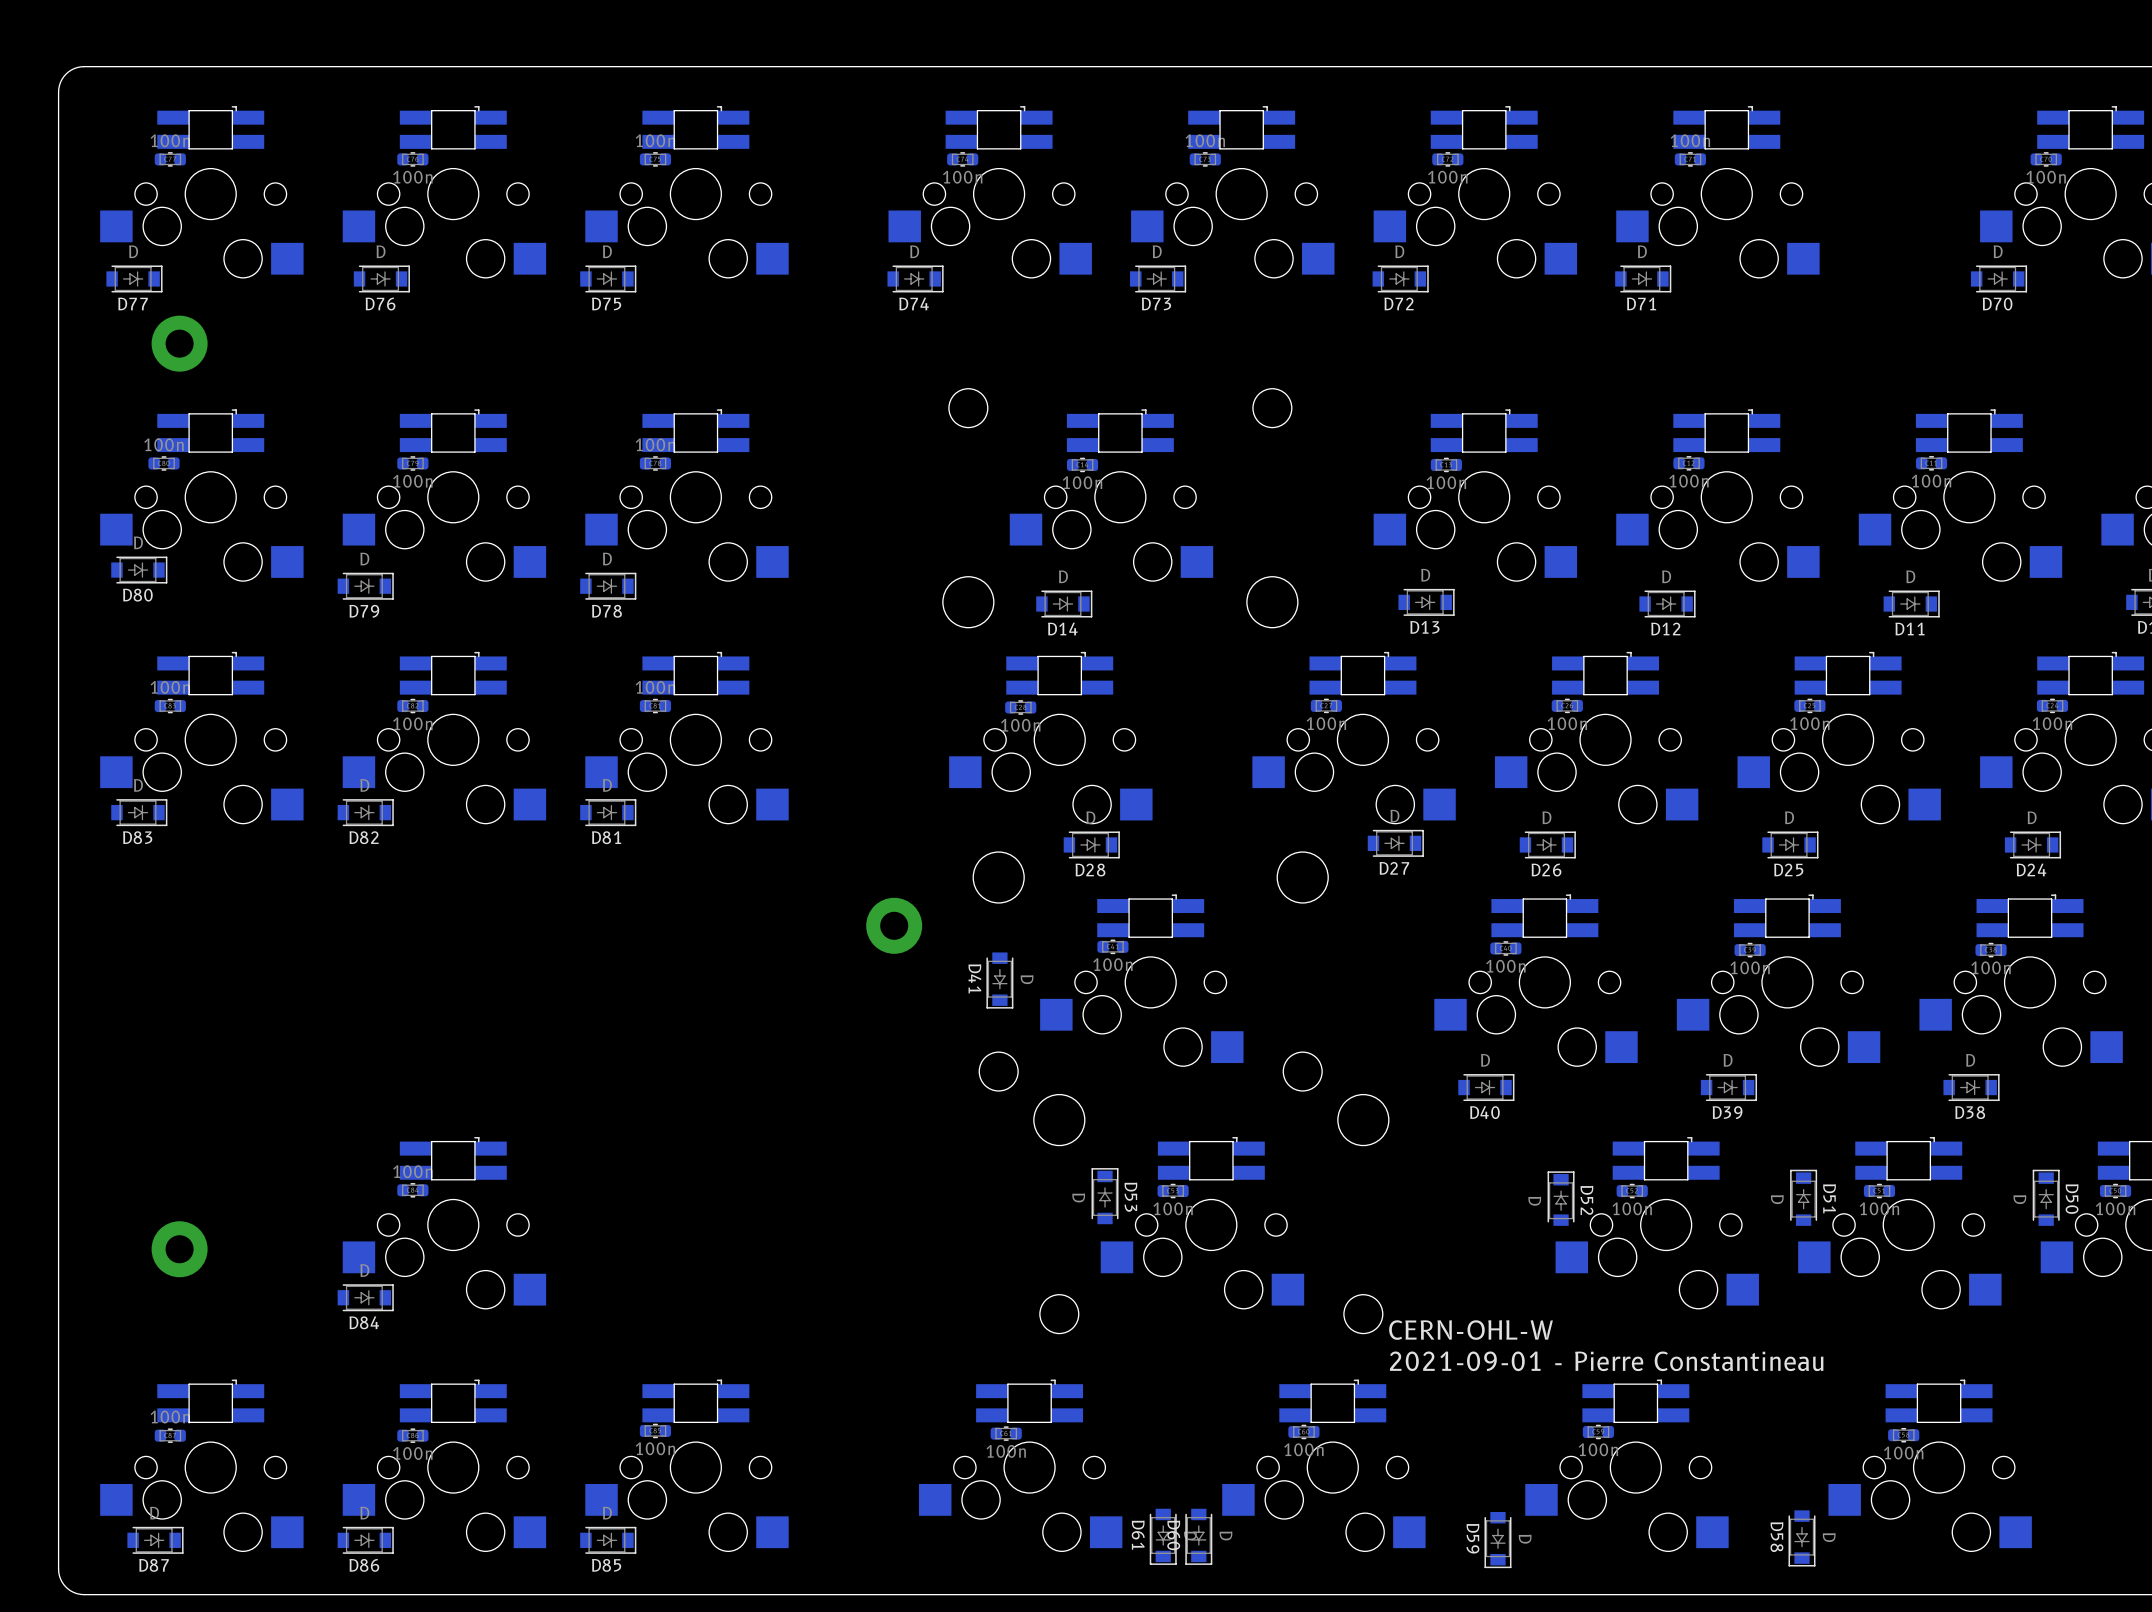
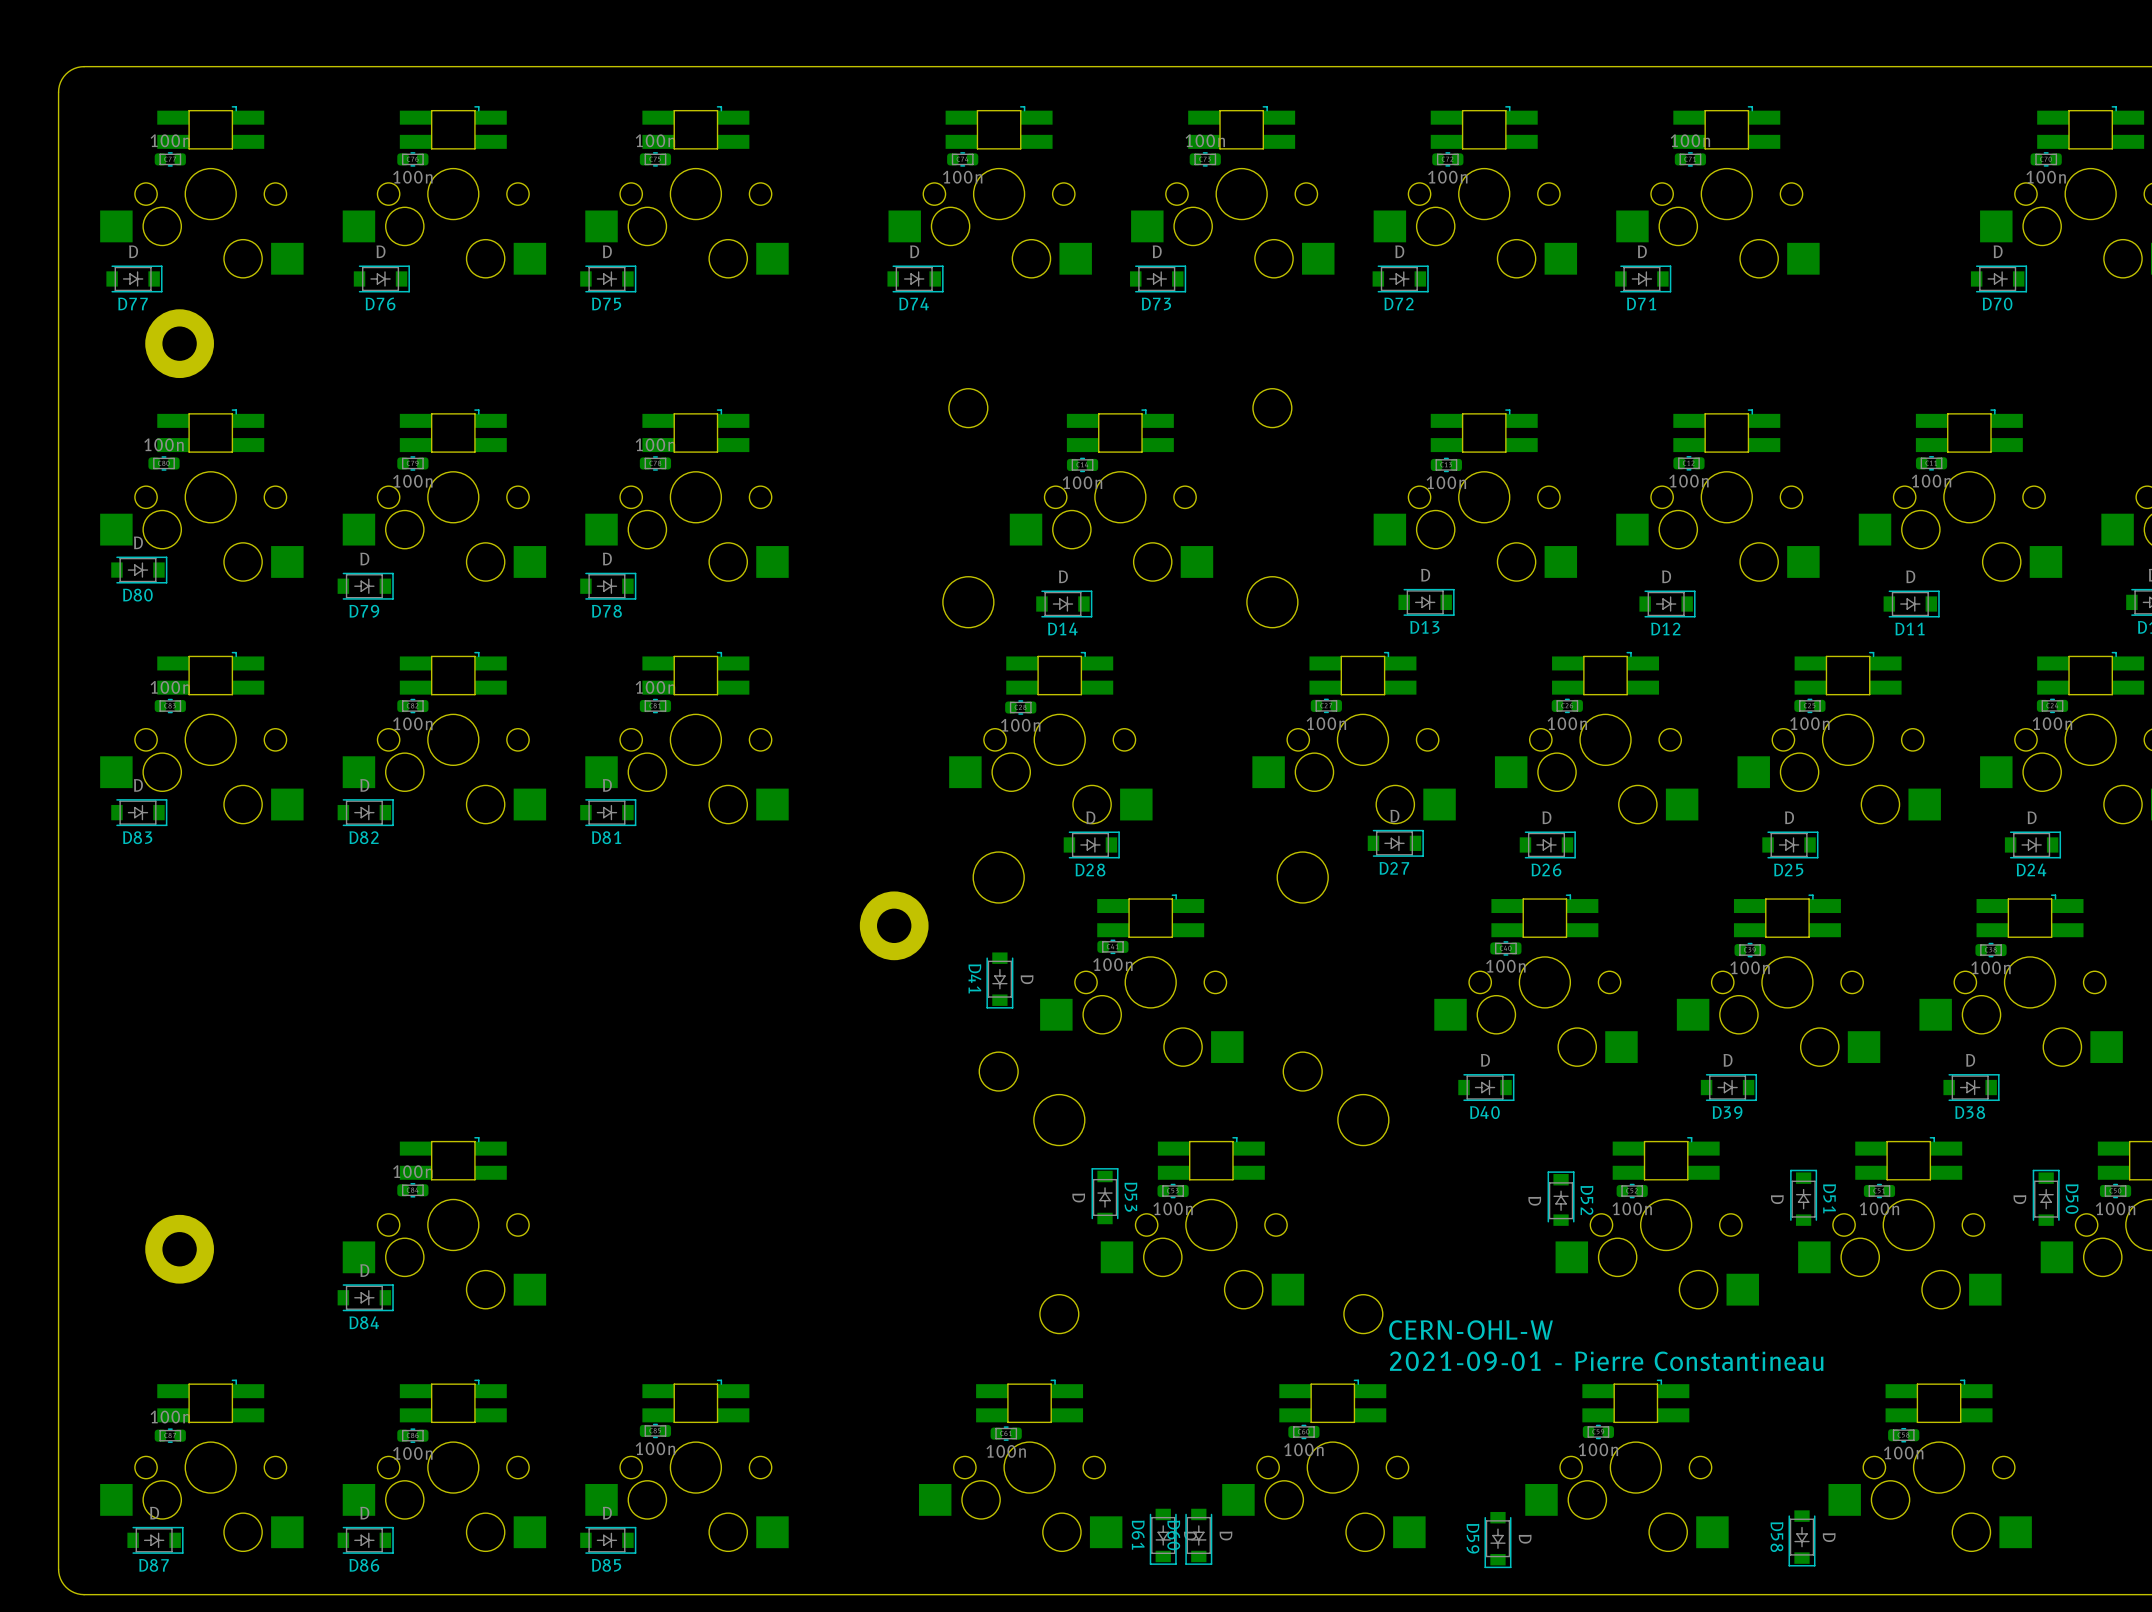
part footprint: [151, 315, 208, 372] -> [145, 309, 214, 379]
part footprint: [866, 897, 923, 954] -> [859, 891, 929, 961]
part footprint: [151, 1221, 208, 1278] -> [145, 1214, 214, 1284]

